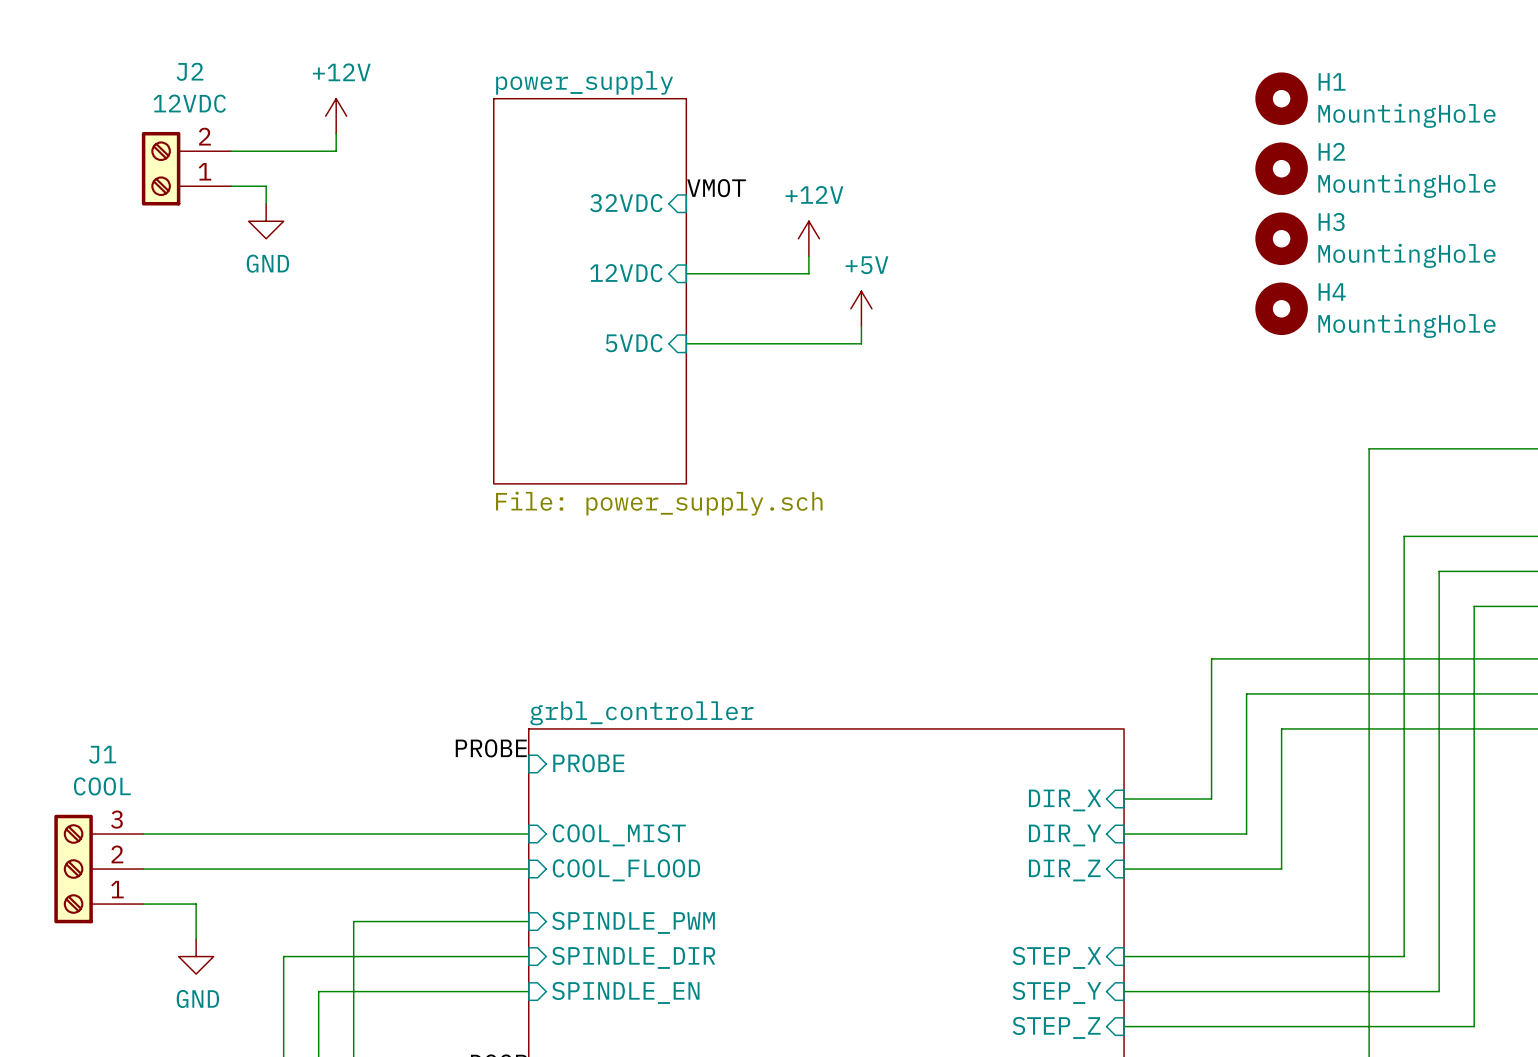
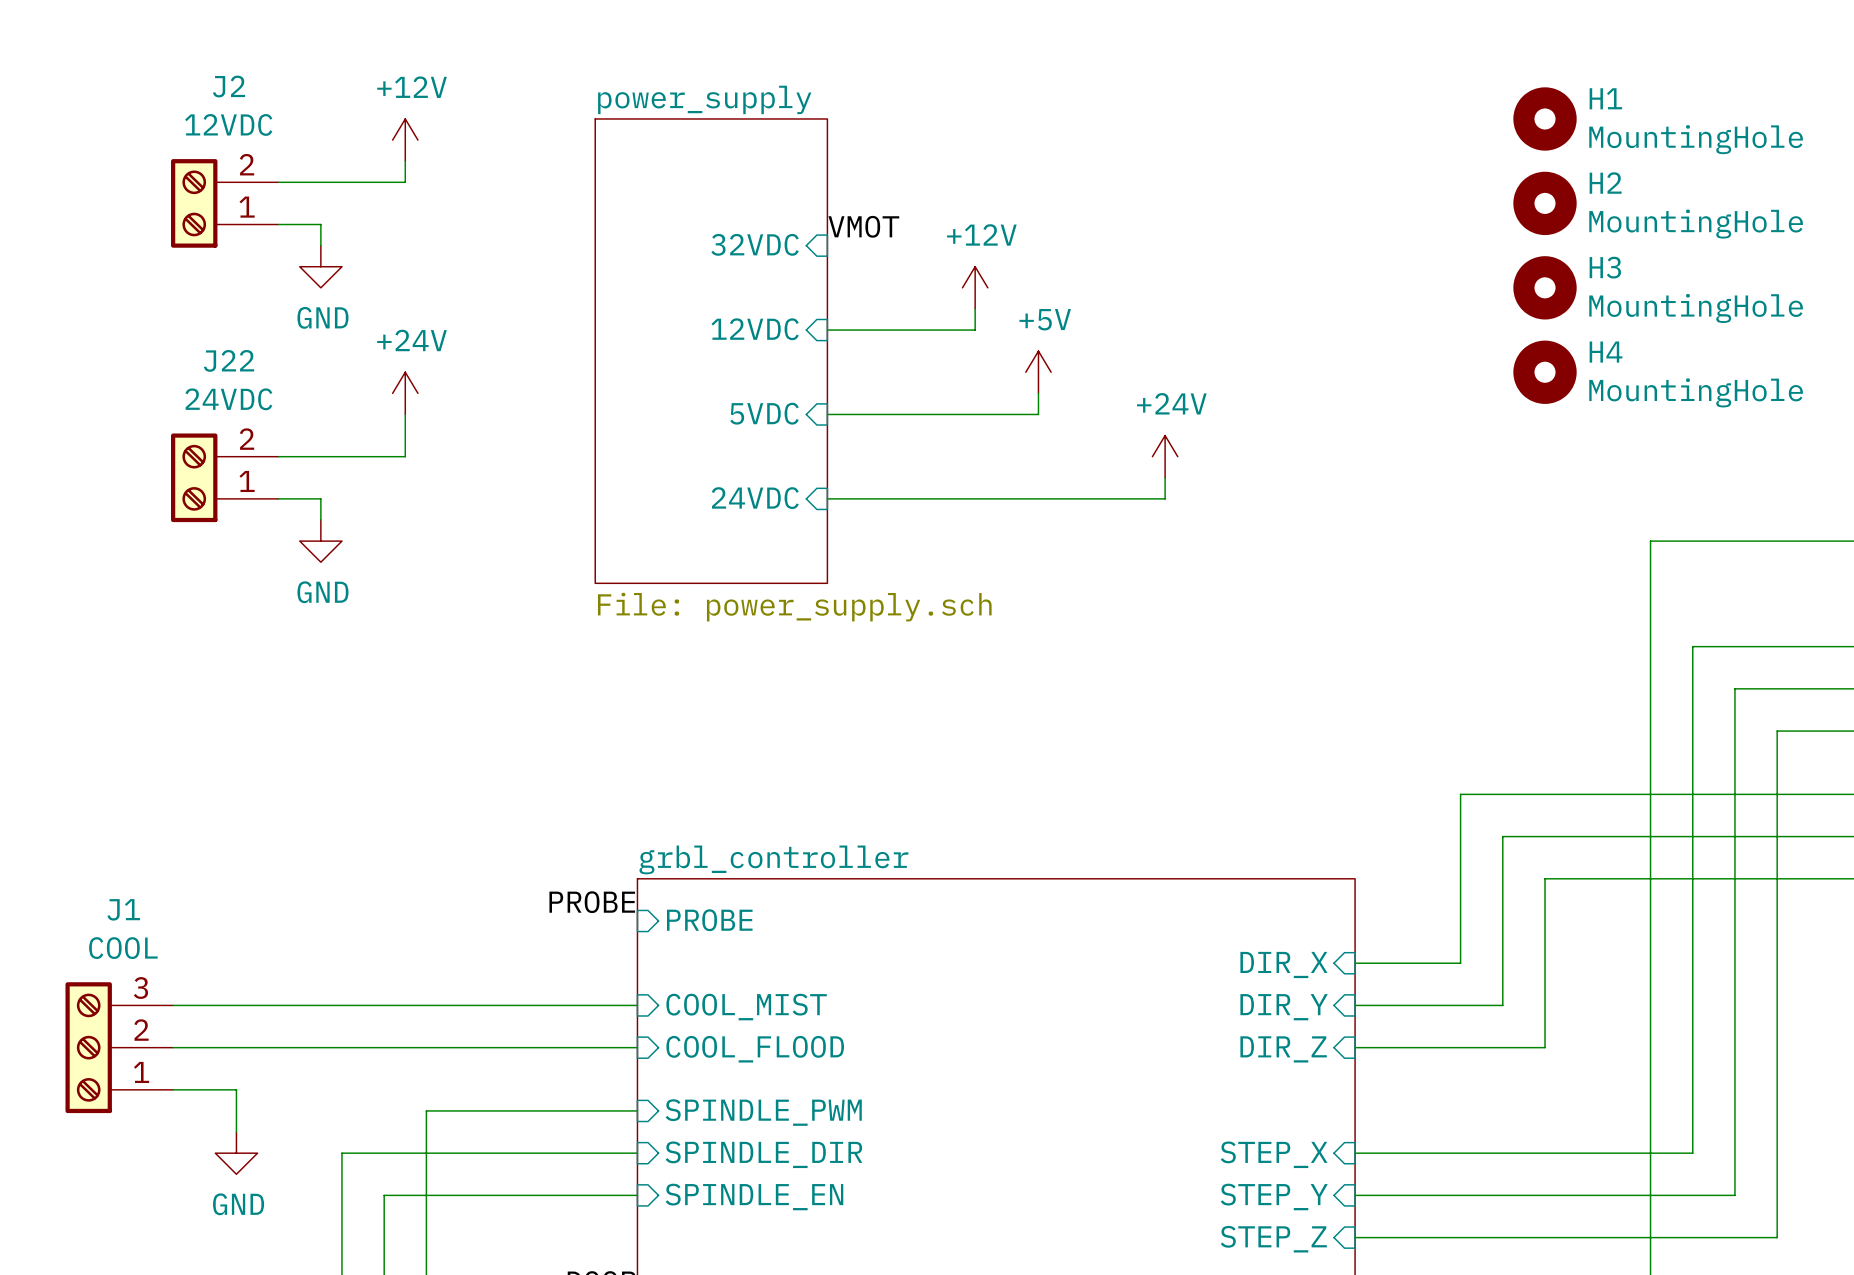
power symbol: none -> +24V (405, 393)
wire: none -> (405, 414) (405, 456) (278, 456)
power symbol: none -> +24V (1165, 456)
J22: none -> 24VDC (224, 477)
wire: none -> (1165, 477) (1165, 498) (827, 498)
wire: none -> (278, 498) (320, 498) (320, 520)
sheet pin: none -> 24VDC (755, 498)
power symbol: none -> GND (320, 541)

